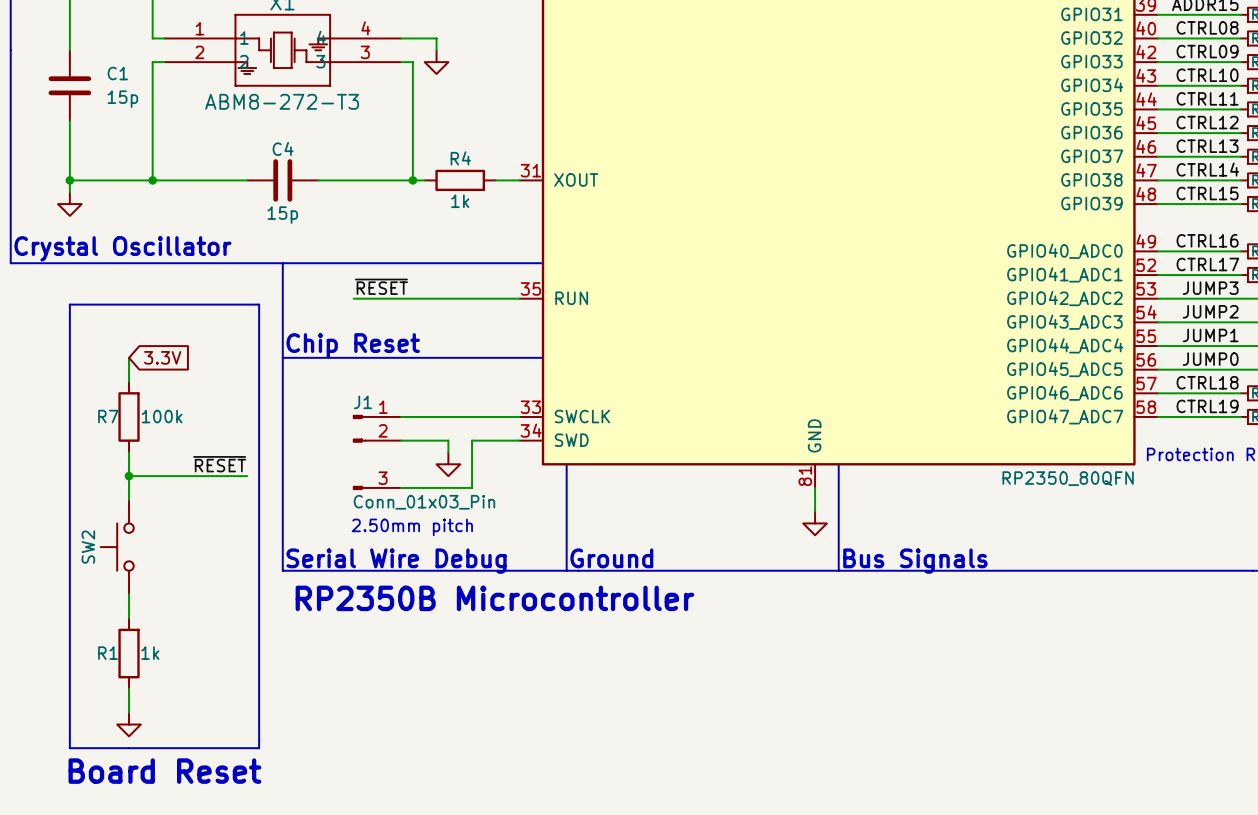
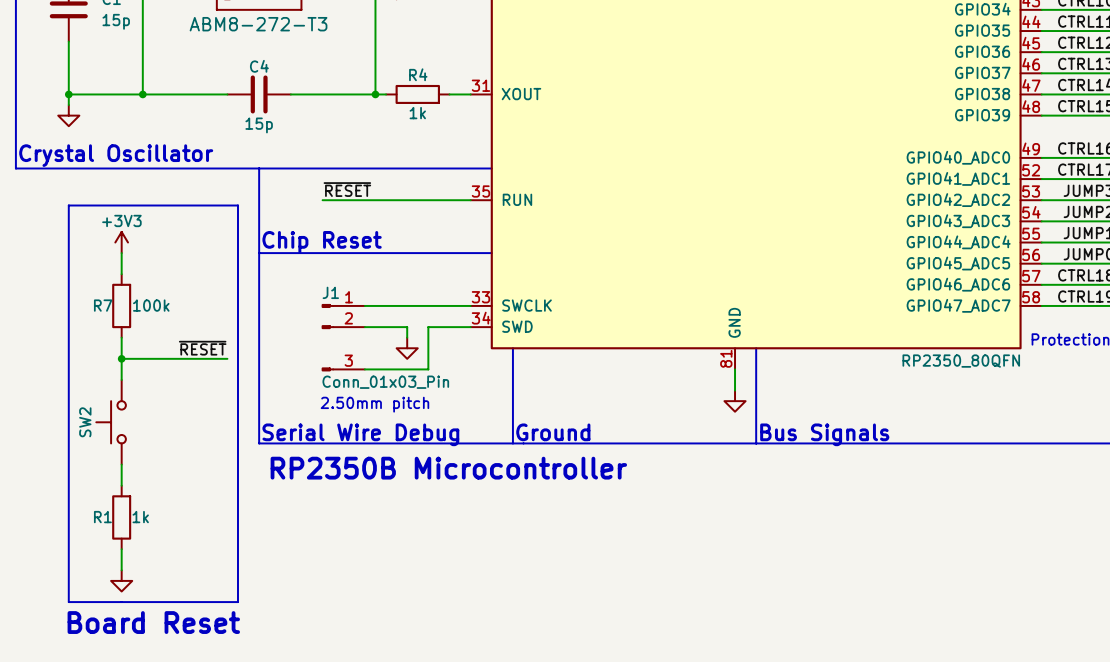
power symbol: none -> +3V3 (121, 242)
global label: 3.3V (162, 357) -> none

